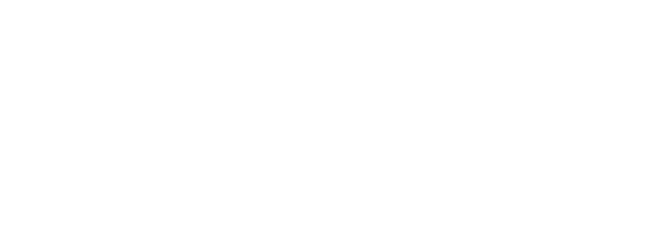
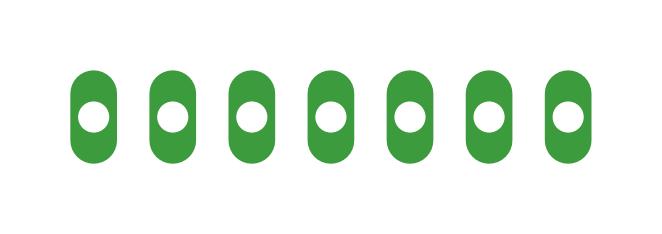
part: none -> (330, 117)

